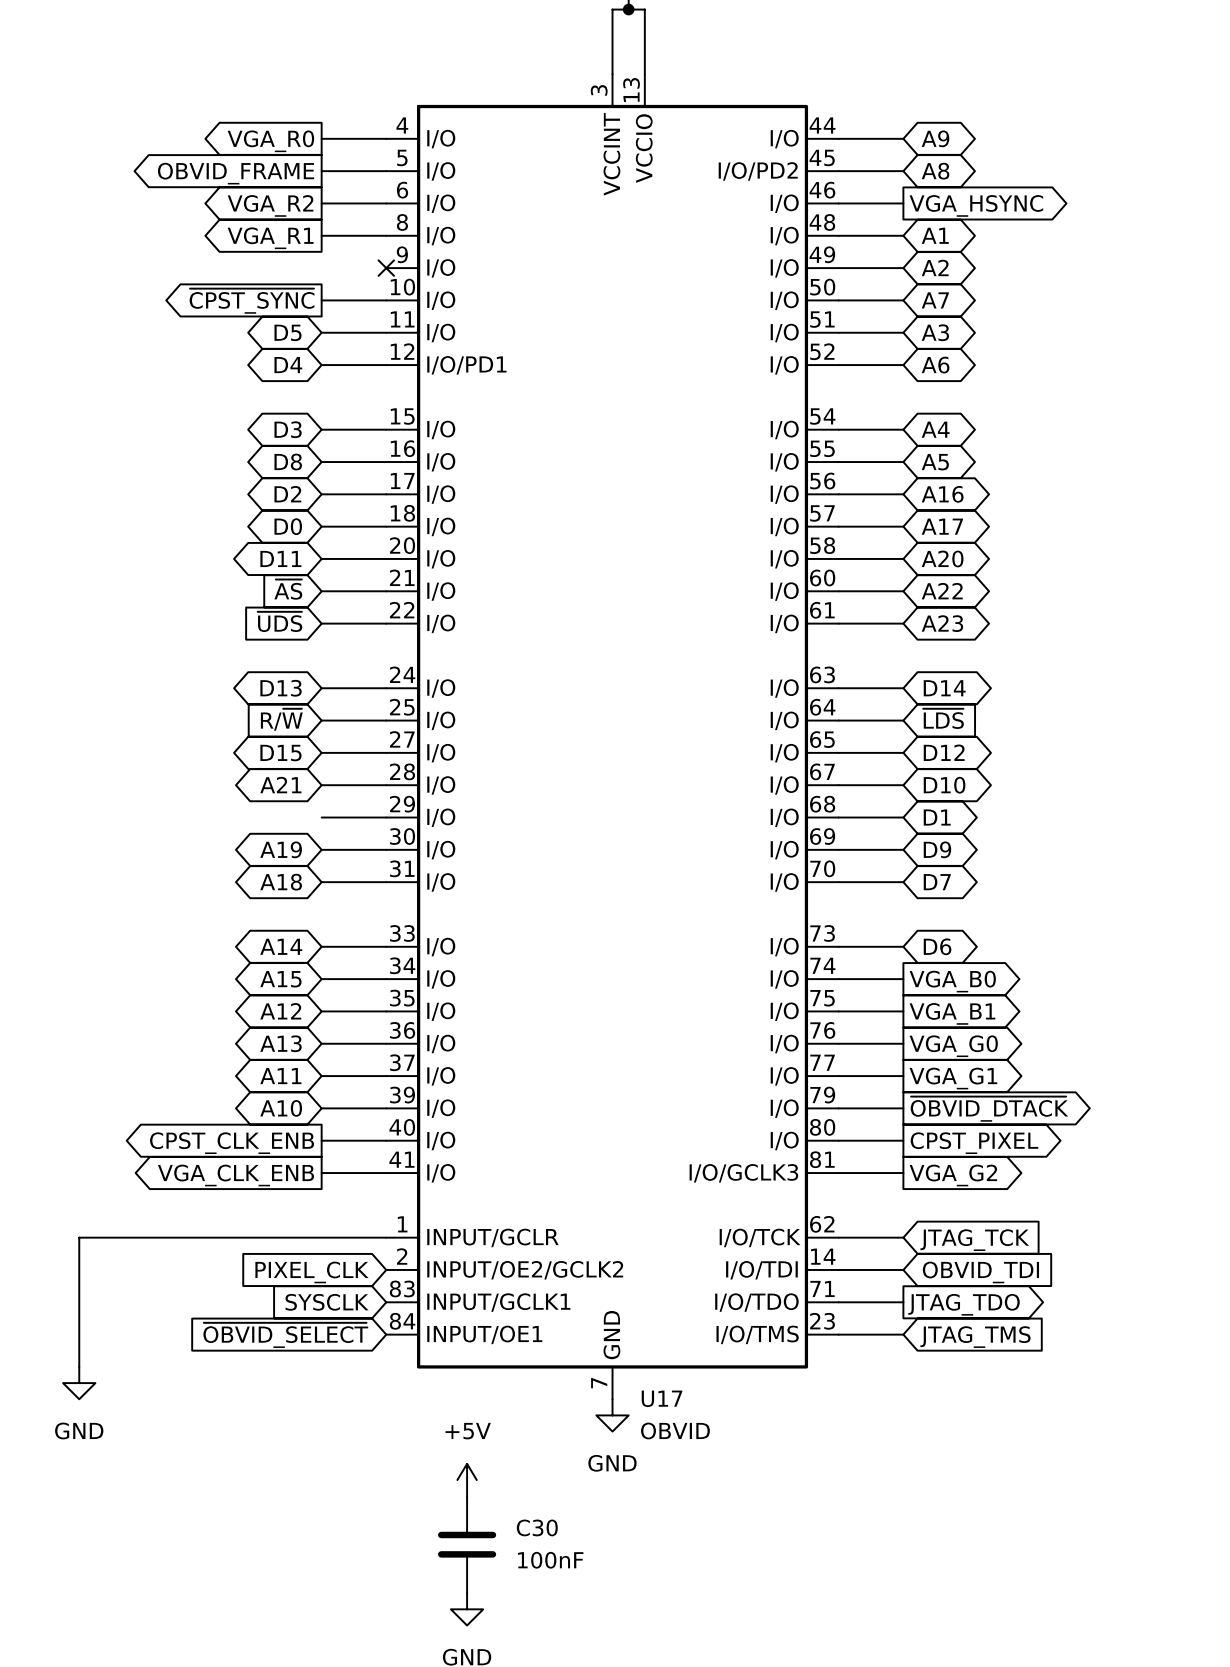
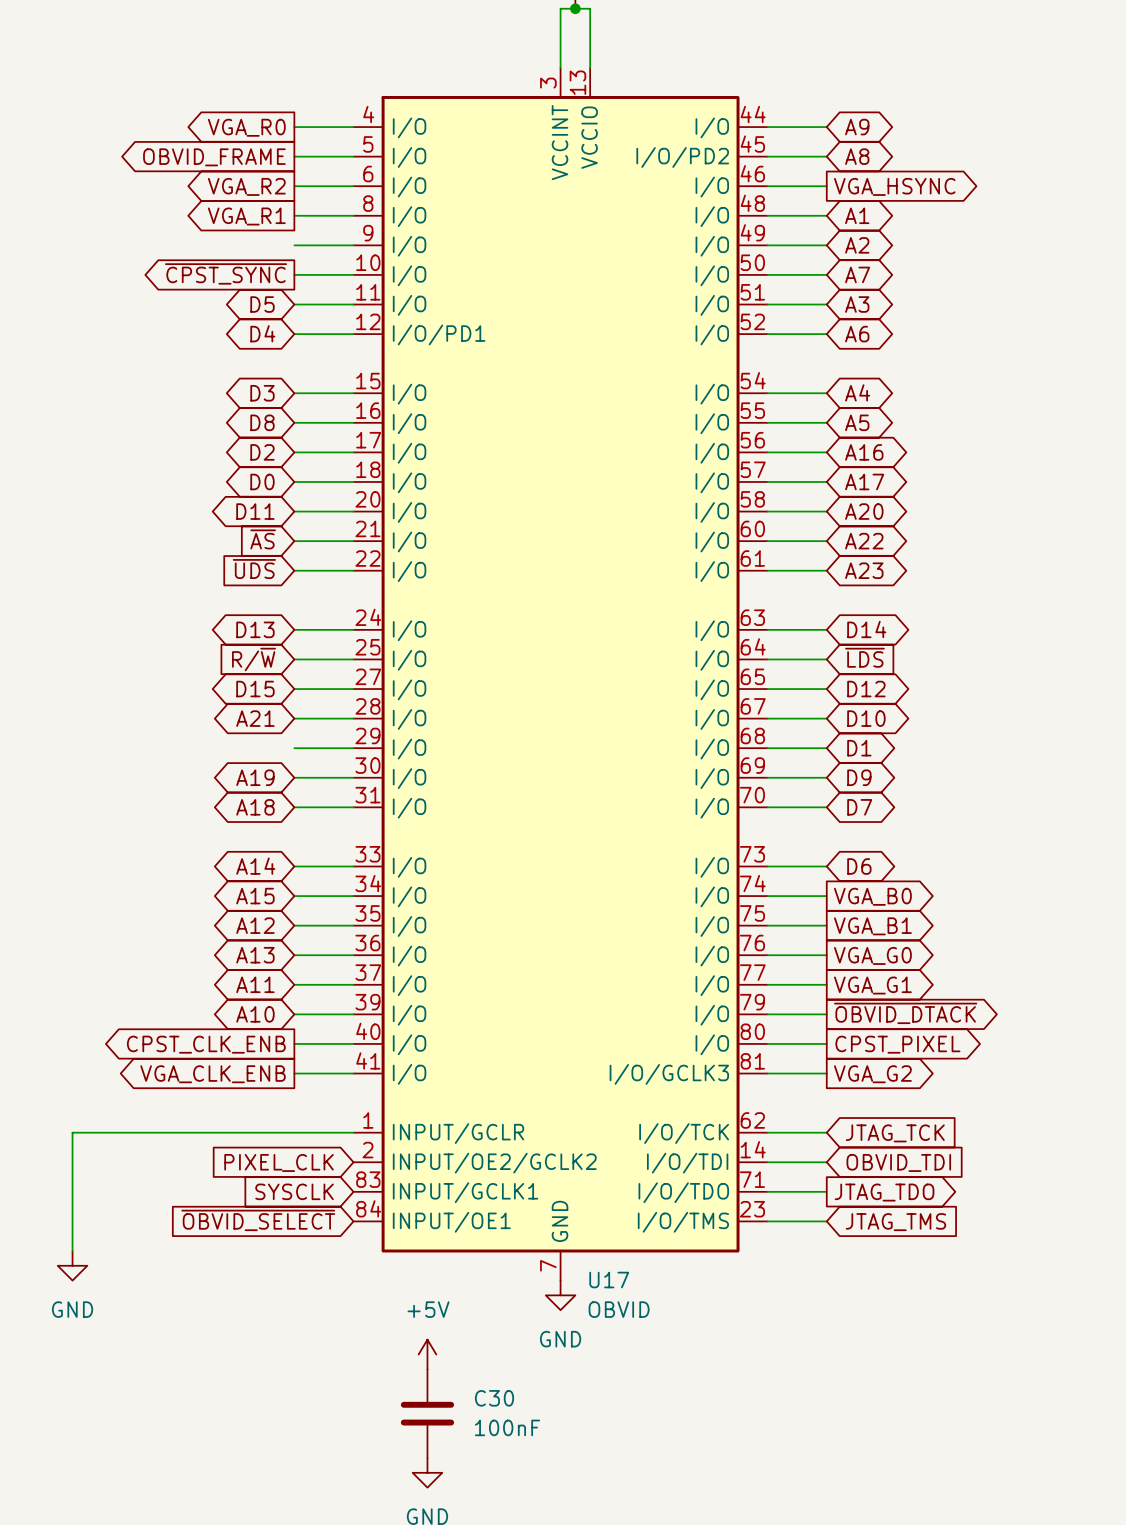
wire: none -> (294, 245) (353, 245)
no-connect mark: (386, 268) -> none

